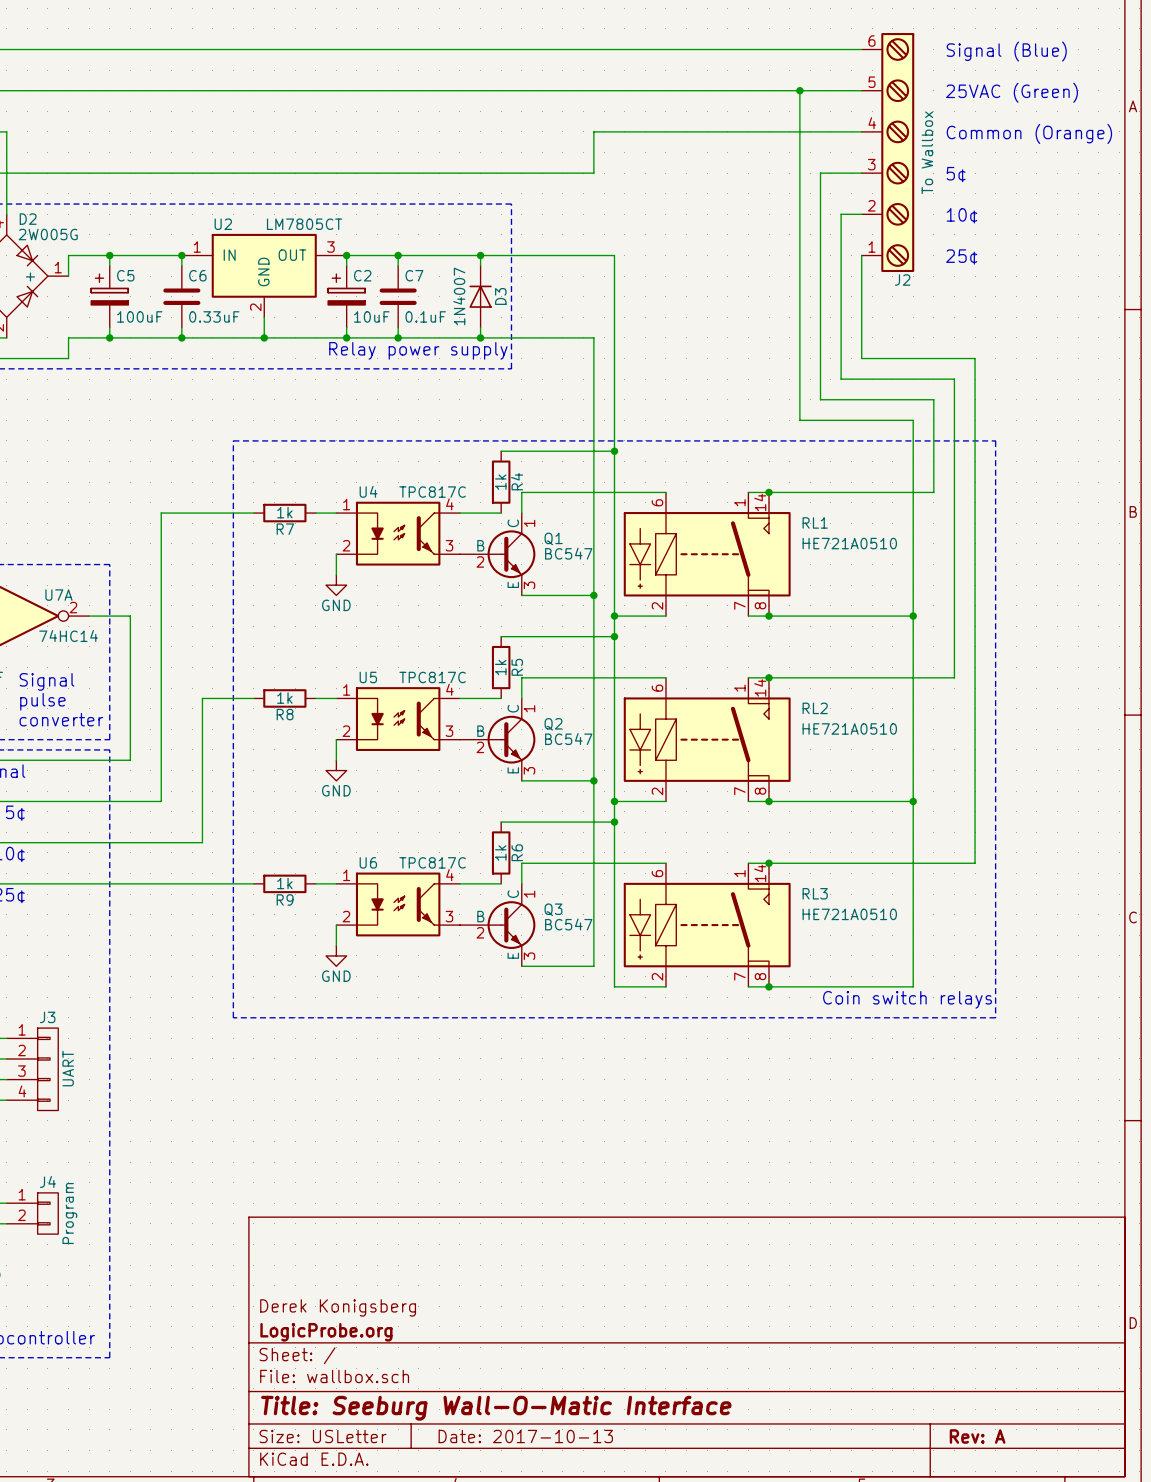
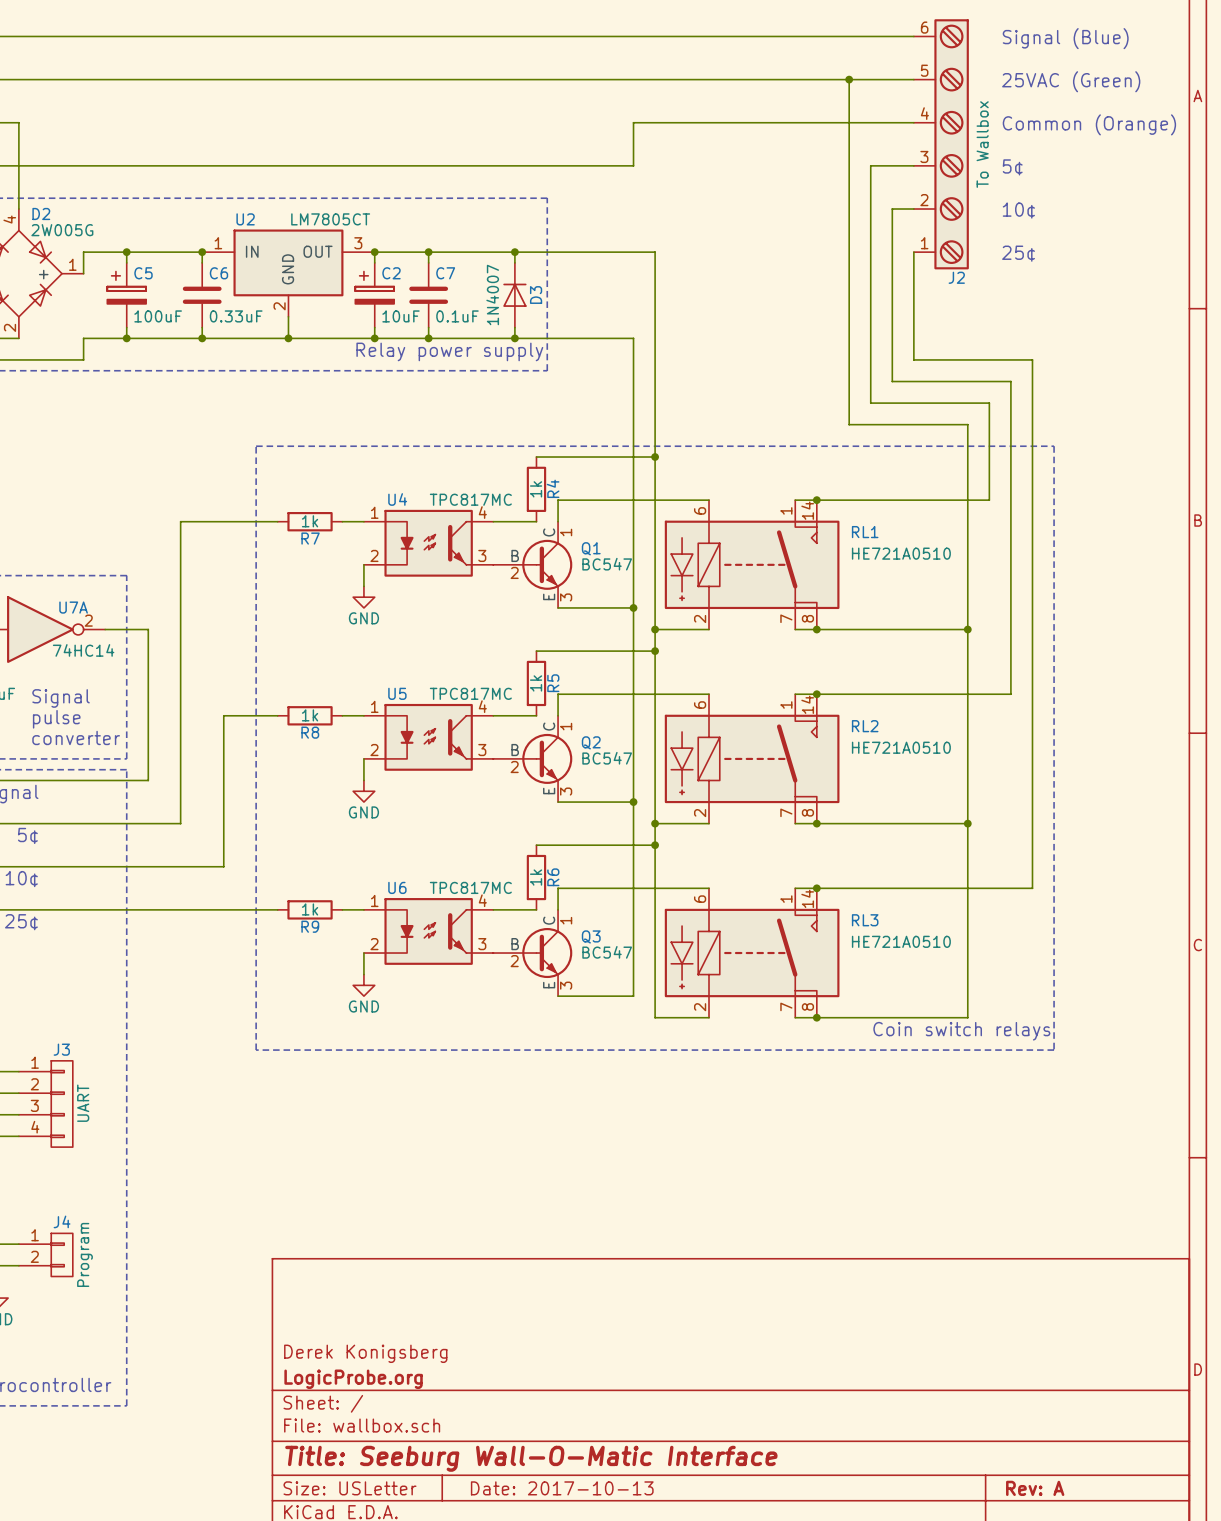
U4 value: TPC817C (432, 492) -> TPC817MC (470, 499)
U5 value: TPC817C (432, 677) -> TPC817MC (470, 693)
U6 value: TPC817C (432, 862) -> TPC817MC (470, 887)

